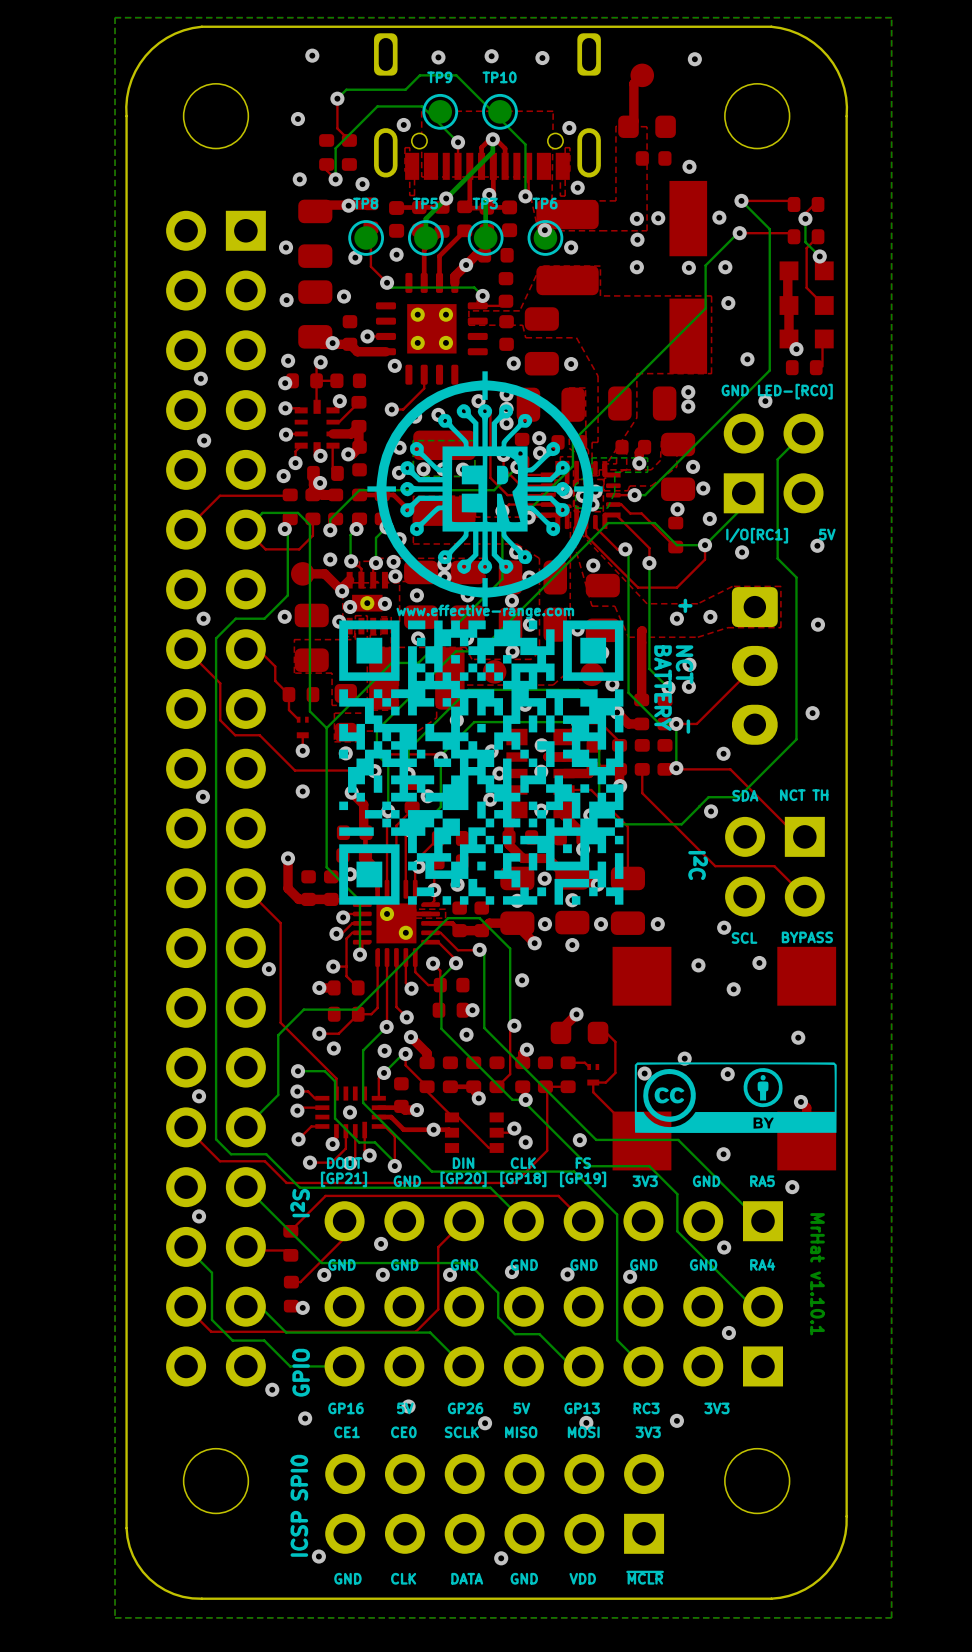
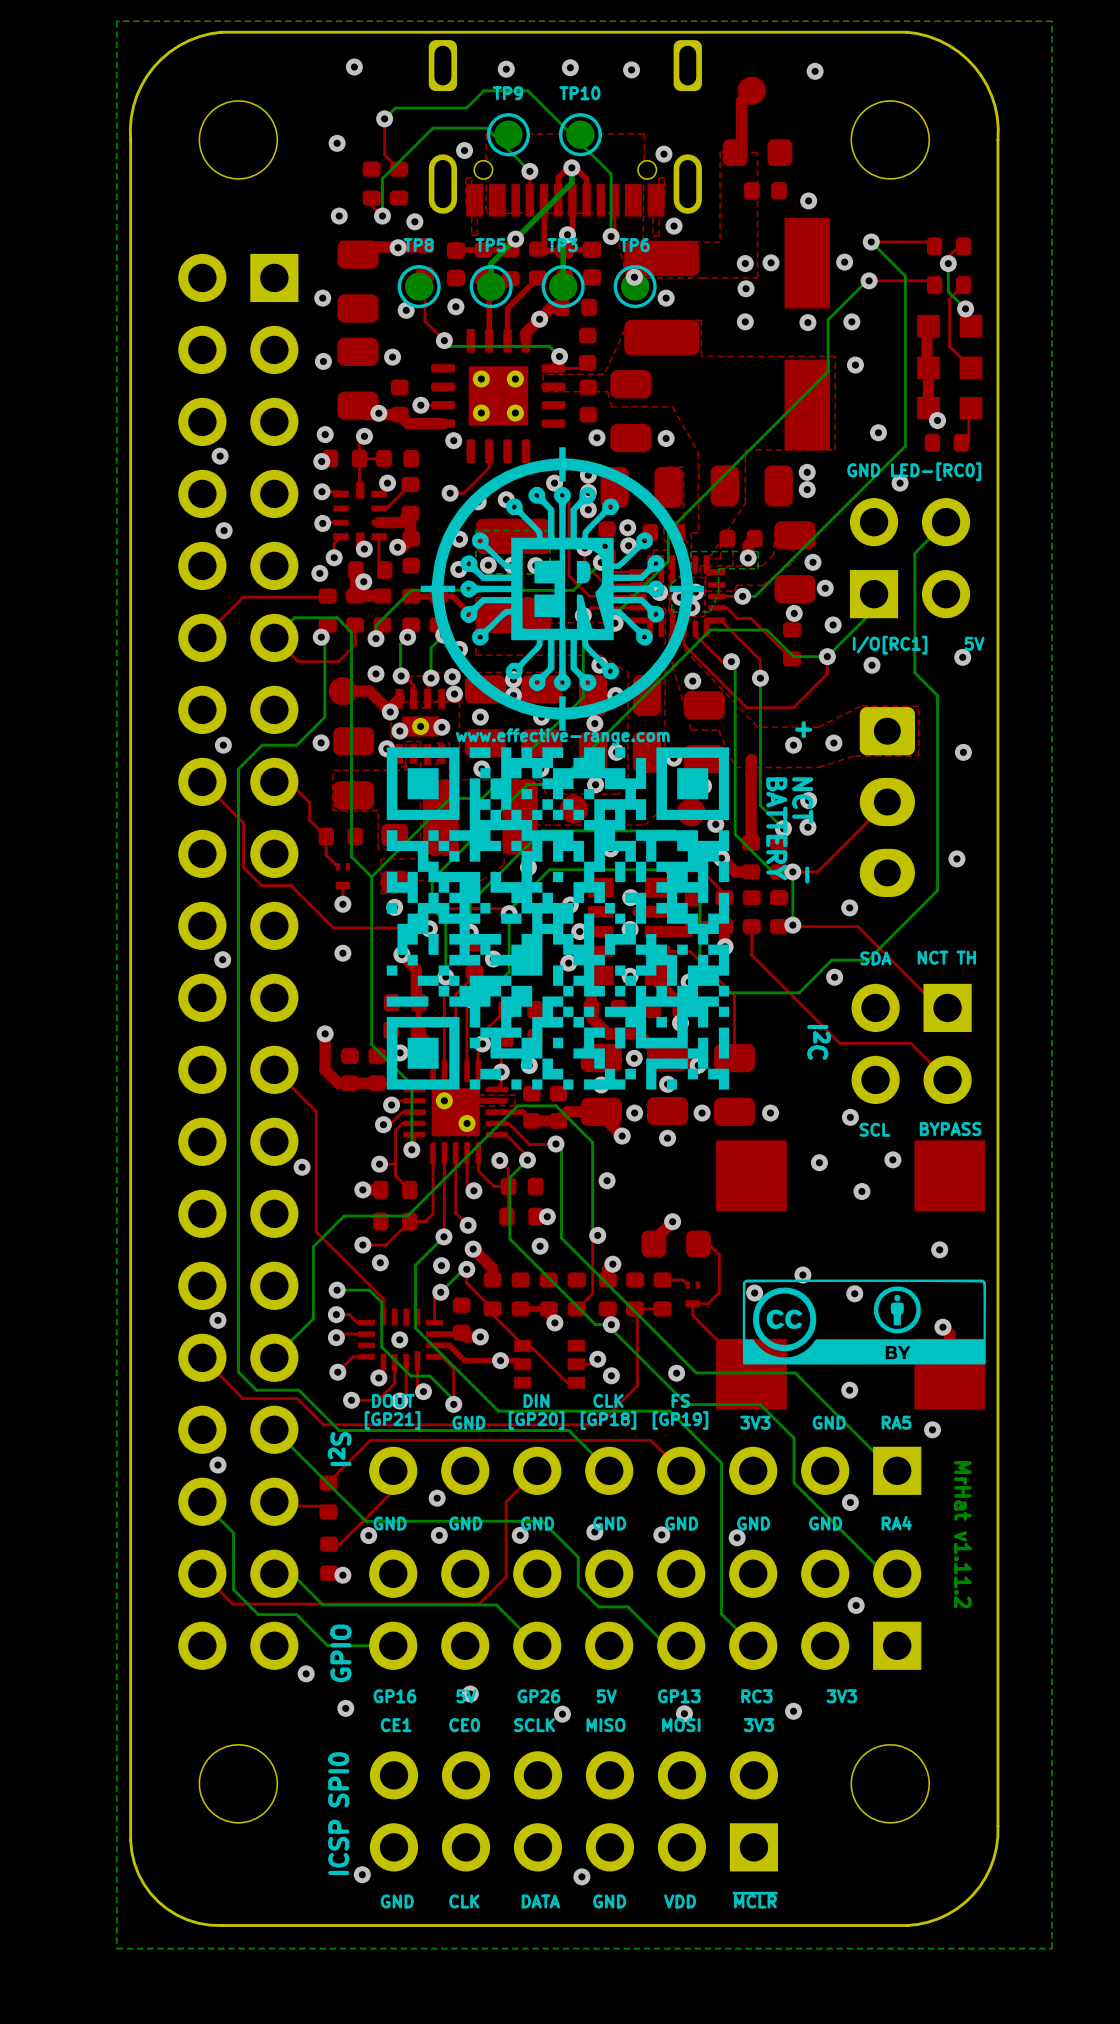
text: MrHat v1.10.1 (817, 1274) -> MrHat v1.11.2 (962, 1534)

